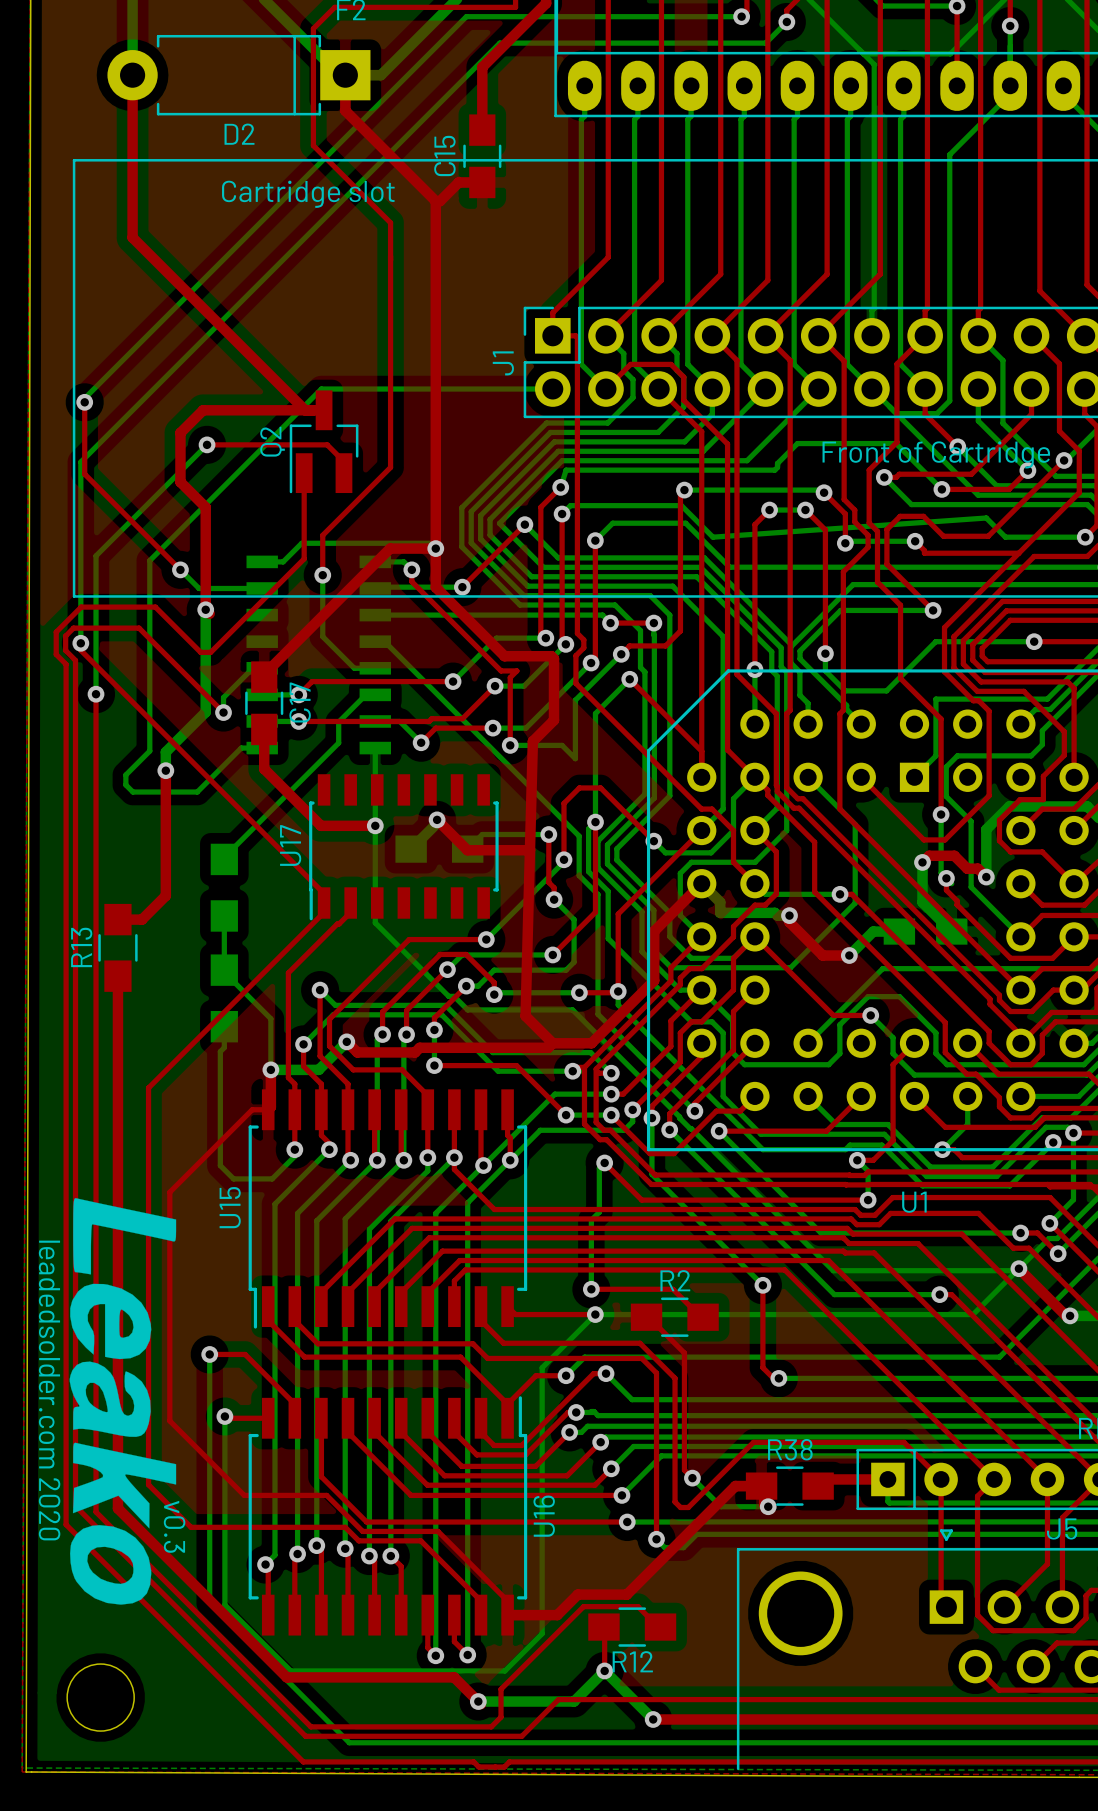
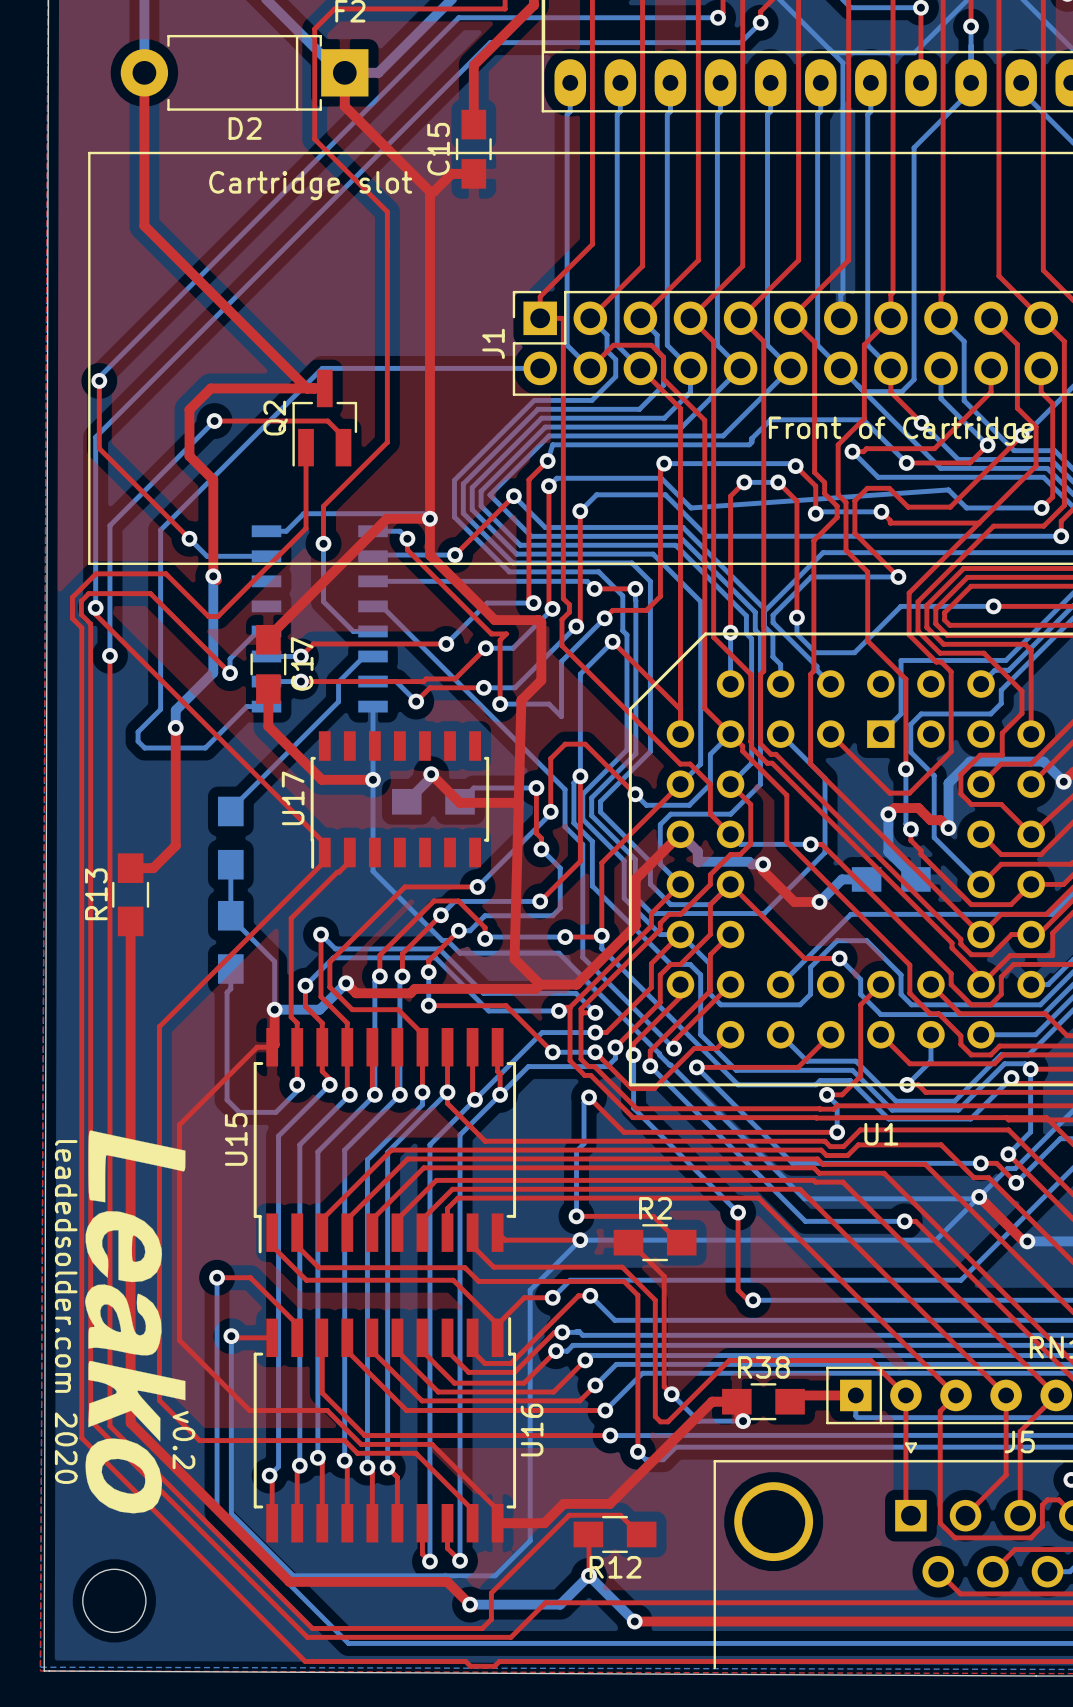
text: v0.3 (174, 1526) -> v0.2 (183, 1440)

